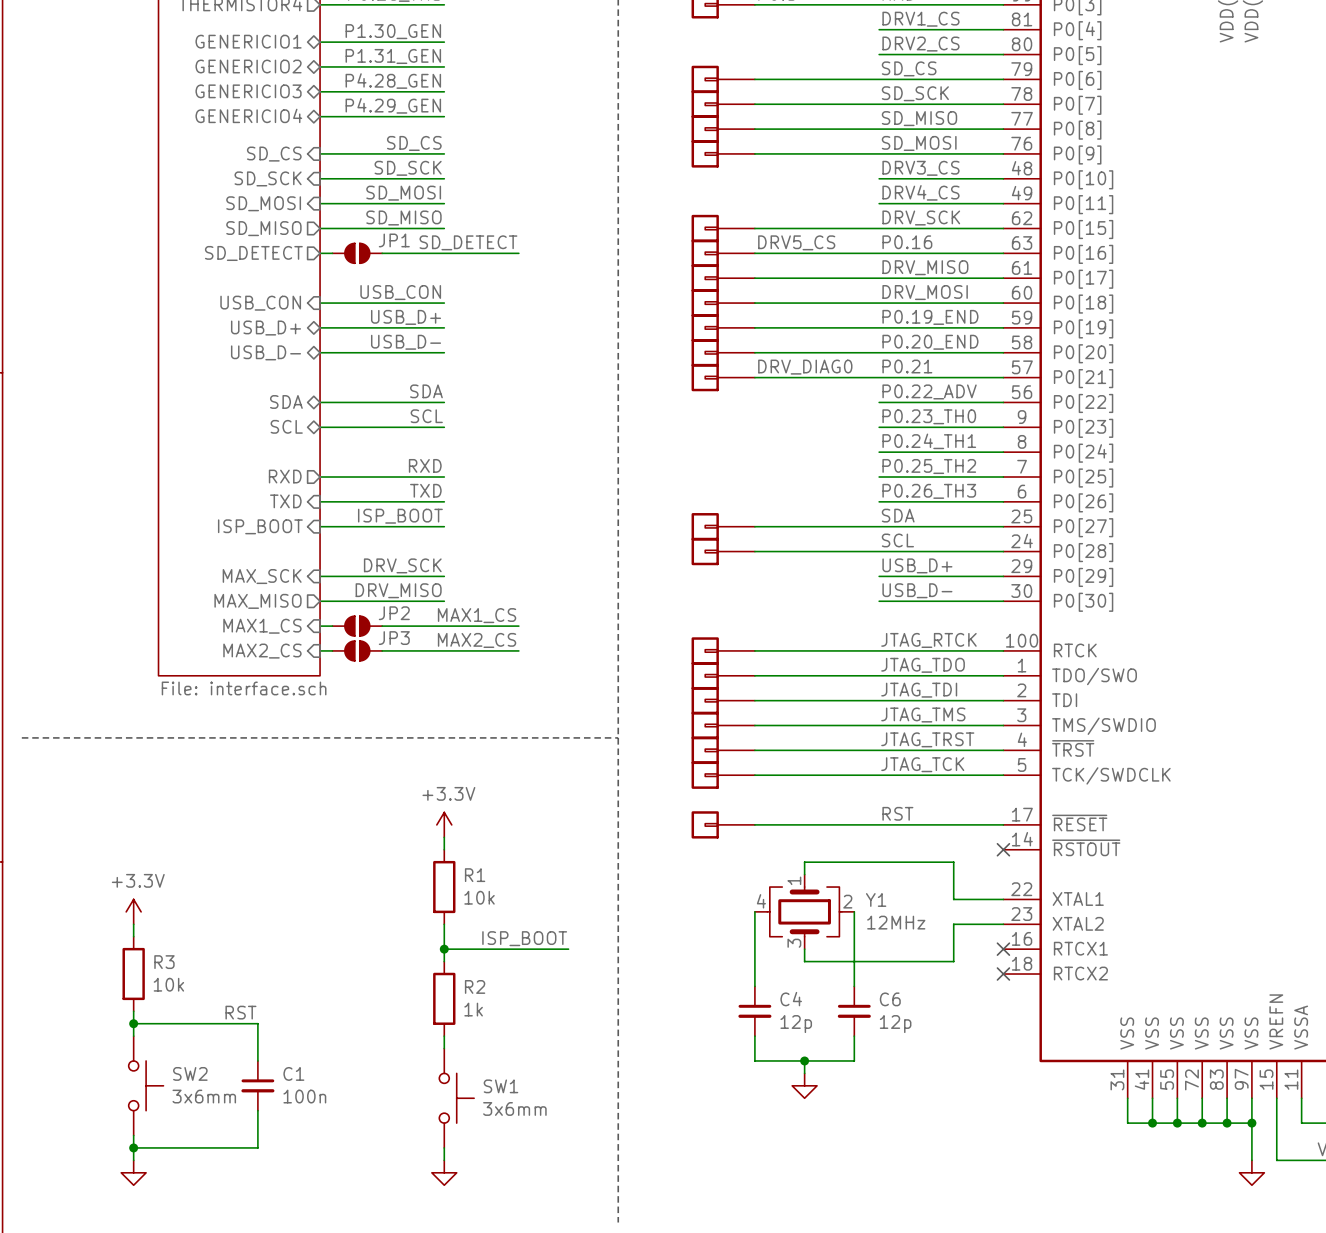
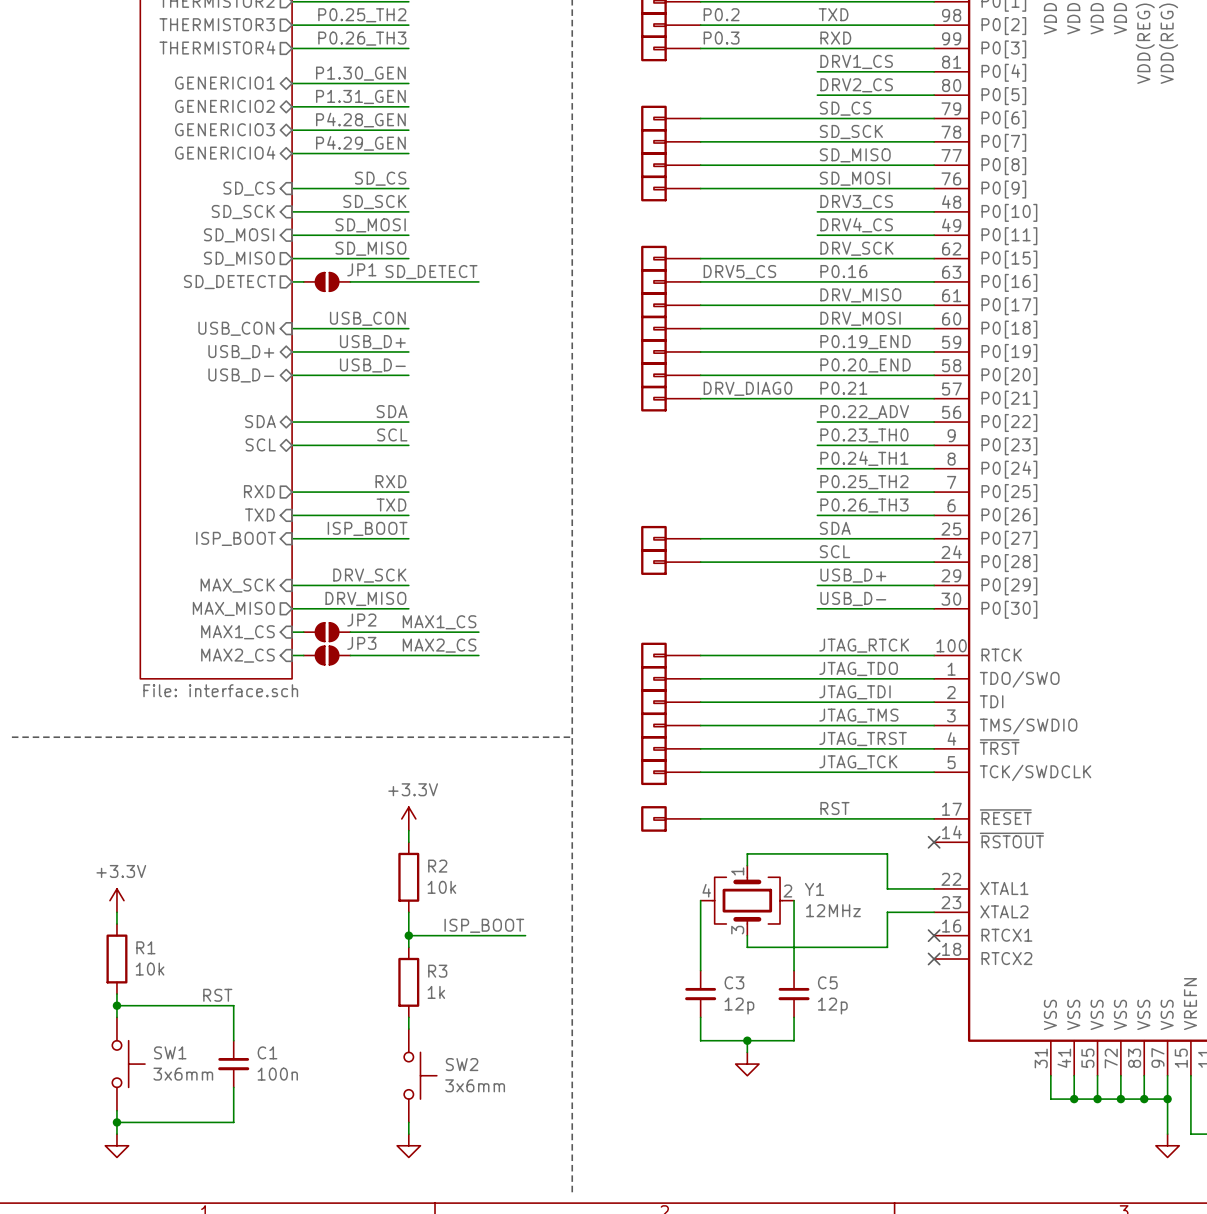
R1 name: R1 (475, 875) -> R2 (437, 866)
R3 name: R3 (164, 962) -> R1 (145, 947)
R2 name: R2 (475, 986) -> R3 (437, 971)
C4 name: C4 (791, 999) -> C3 (734, 982)
C6 name: C6 (890, 999) -> C5 (827, 982)
SW2 name: SW2 (190, 1073) -> SW1 (170, 1052)
SW1 name: SW1 (500, 1086) -> SW2 (462, 1064)

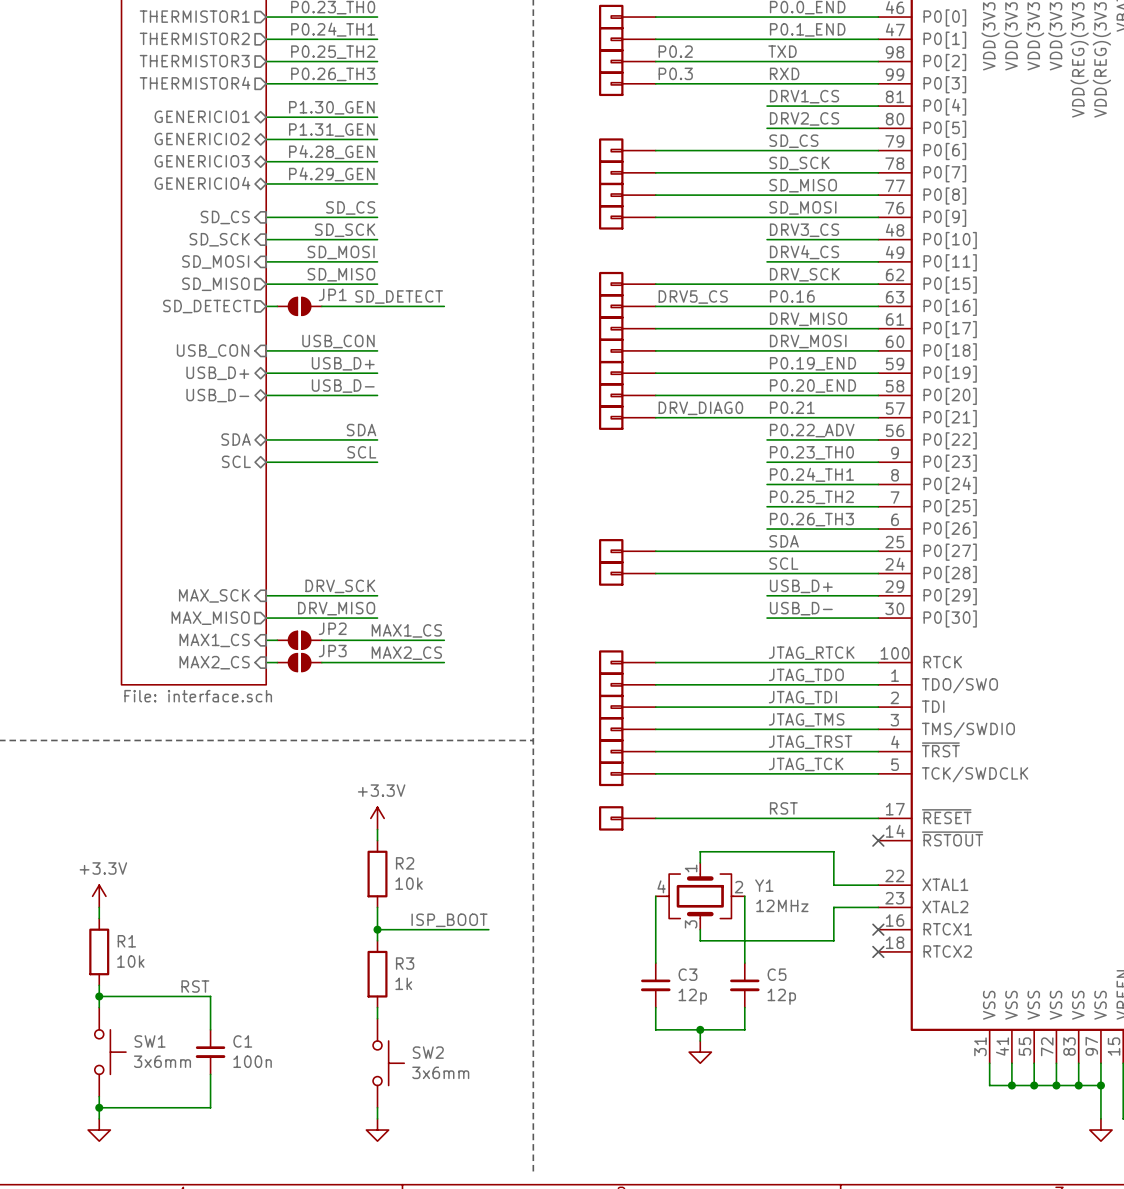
label: RXD (390, 481) -> none
sheet pin: RXD (259, 491) -> none
wire: (292, 492) (408, 492) -> none
label: TXD (391, 504) -> none
sheet pin: TXD (259, 514) -> none
wire: (292, 515) (408, 515) -> none
label: ISP_BOOT (367, 528) -> none
sheet pin: ISP_BOOT (236, 538) -> none
wire: (292, 538) (408, 538) -> none

